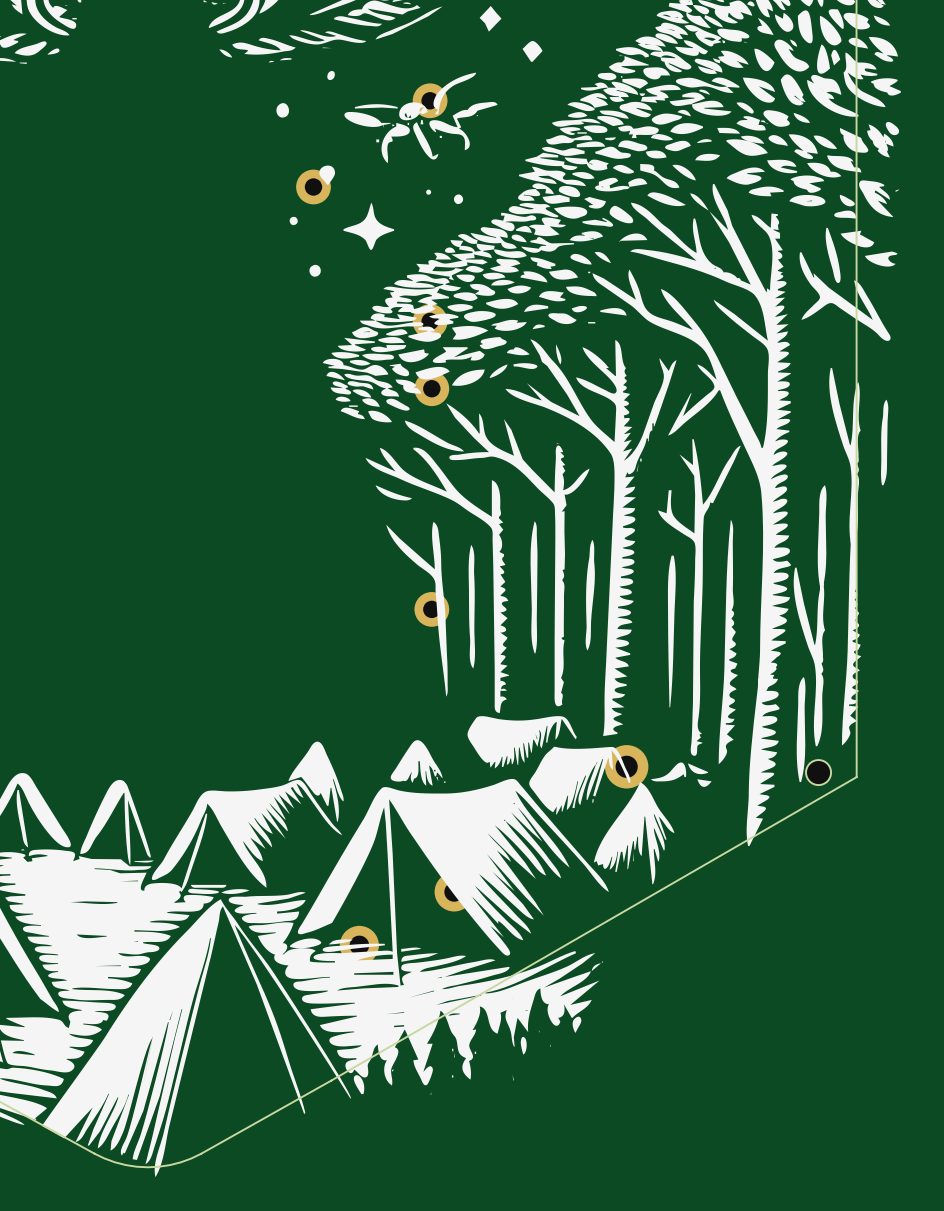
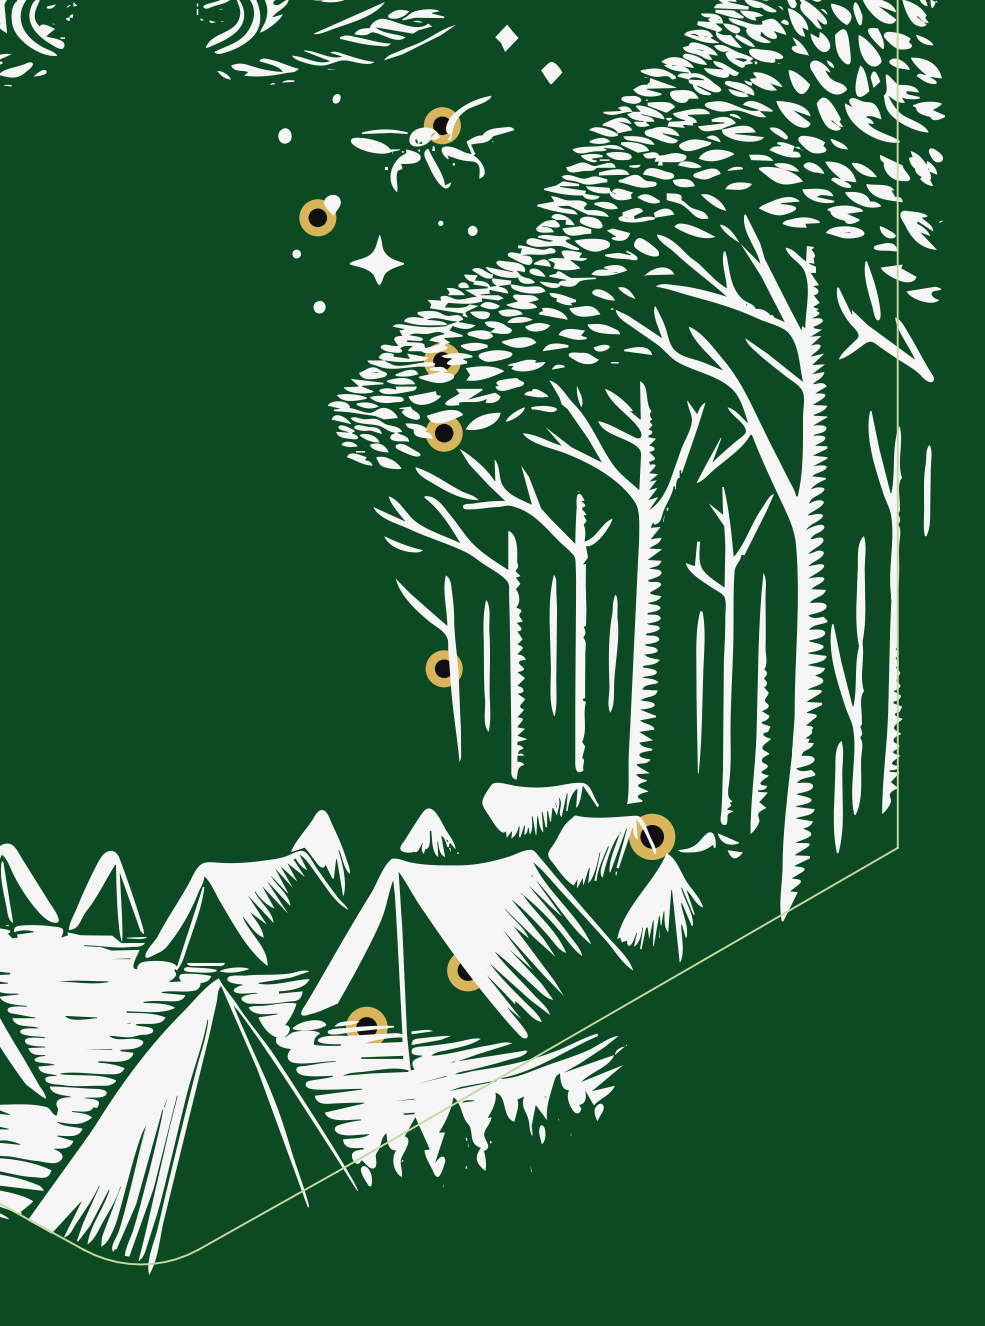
part: (818, 772) -> none

